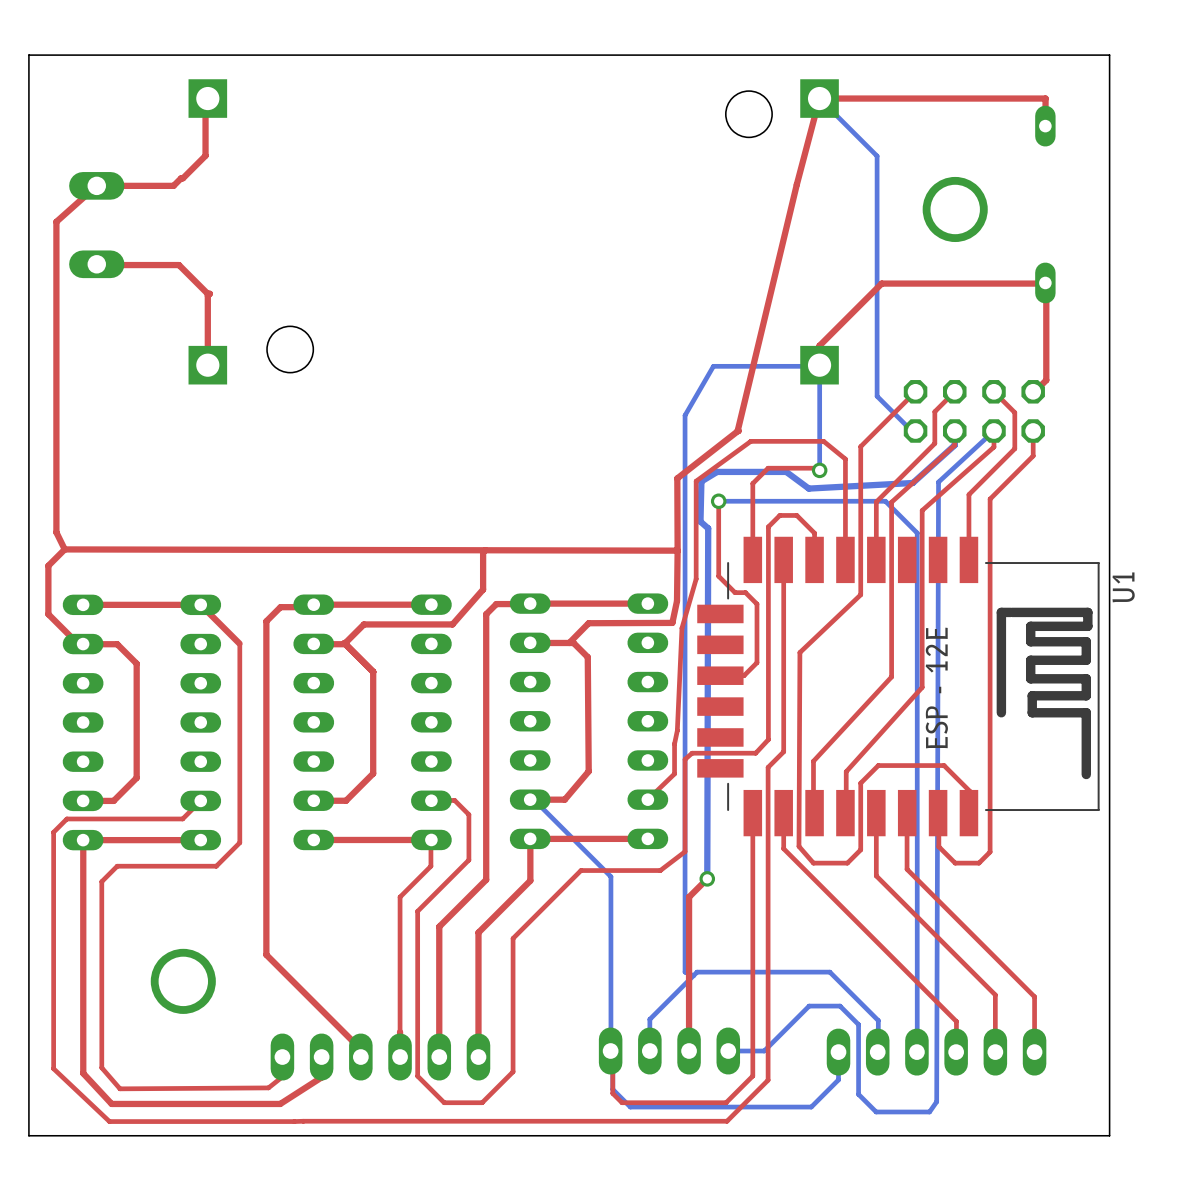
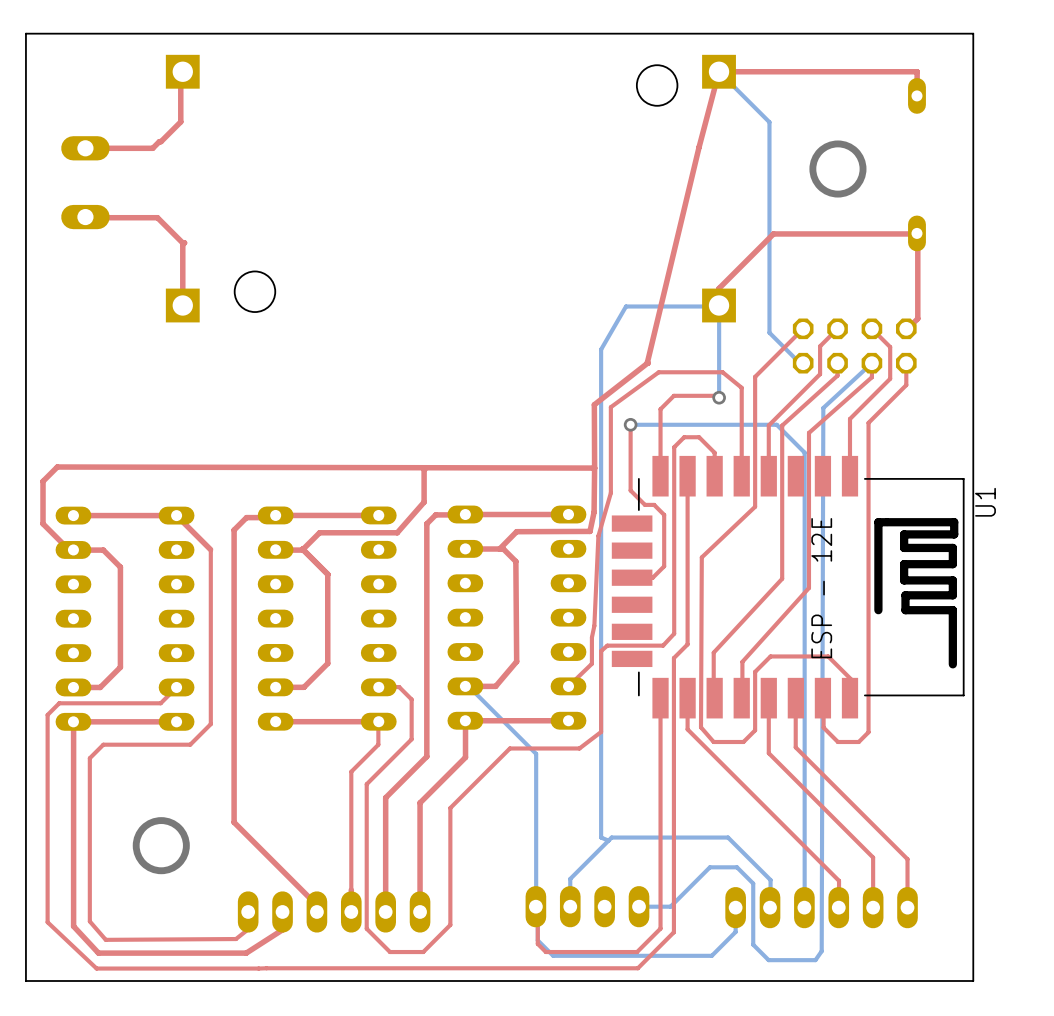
top track: (96, 185) (56, 221) (56, 532) (64, 549) -> none
bottom track: (954, 431) (954, 445) (912, 482) (808, 488) (786, 471) (717, 471) (701, 481) (700, 521) (708, 528) (707, 878) -> none
top track: (707, 878) (689, 897) (689, 1051) -> none
via: (707, 878) -> none

